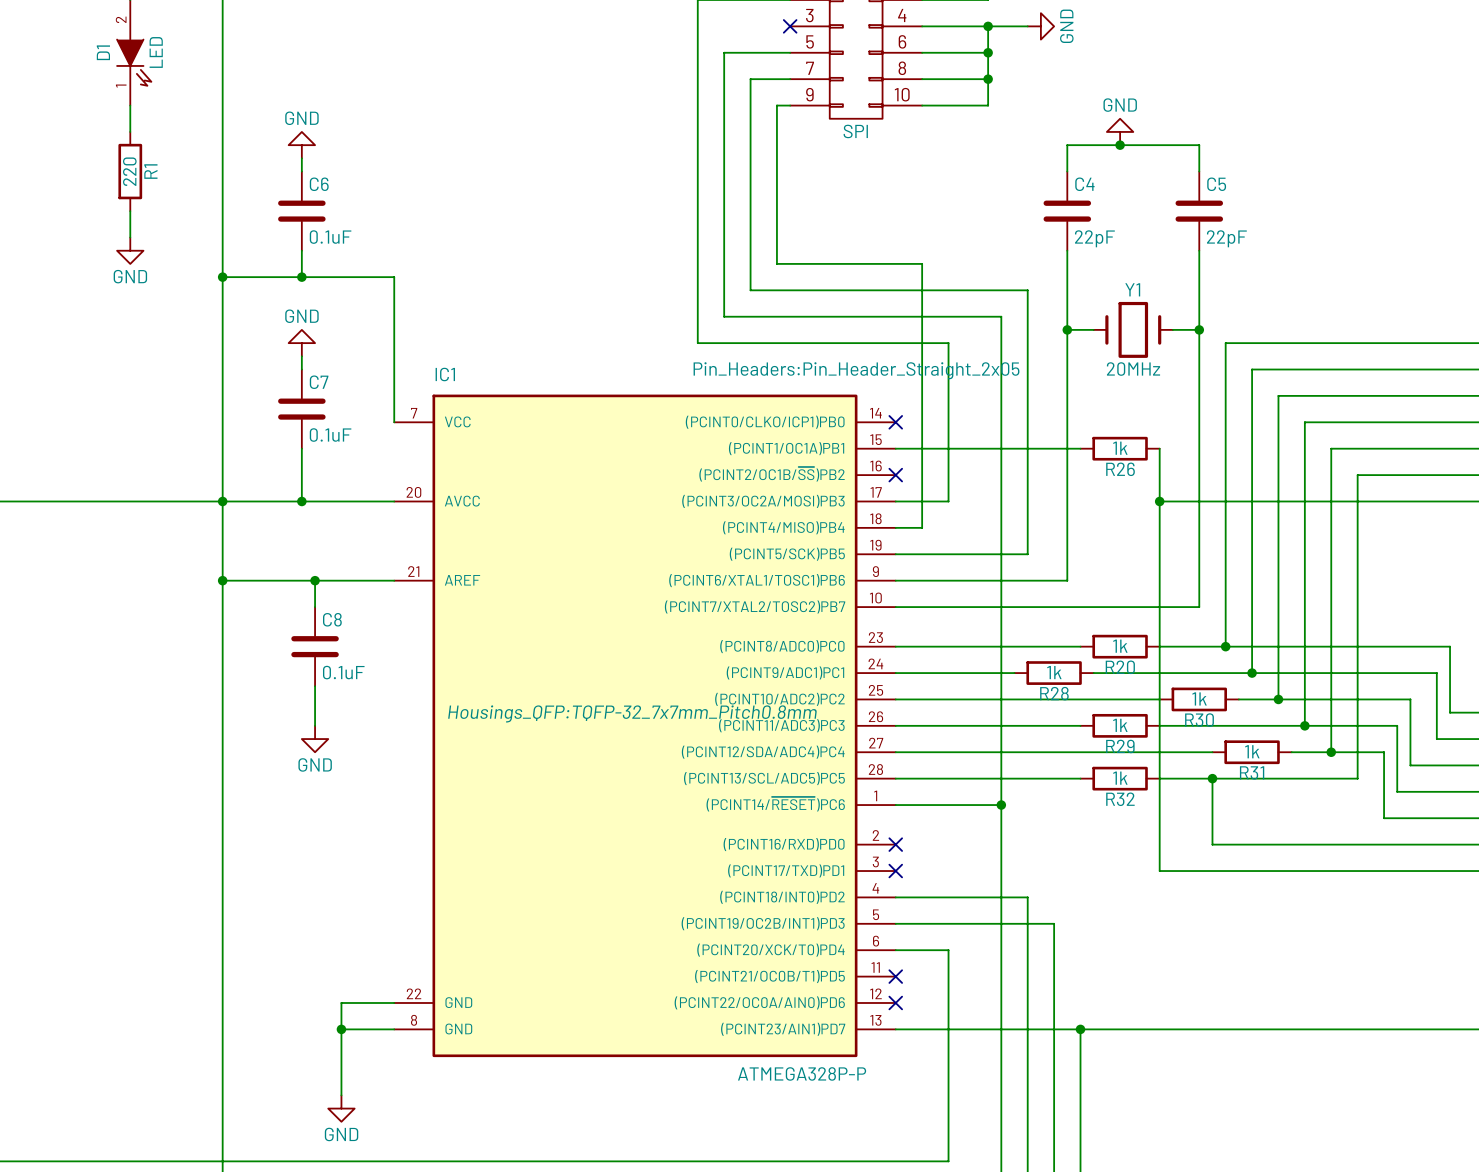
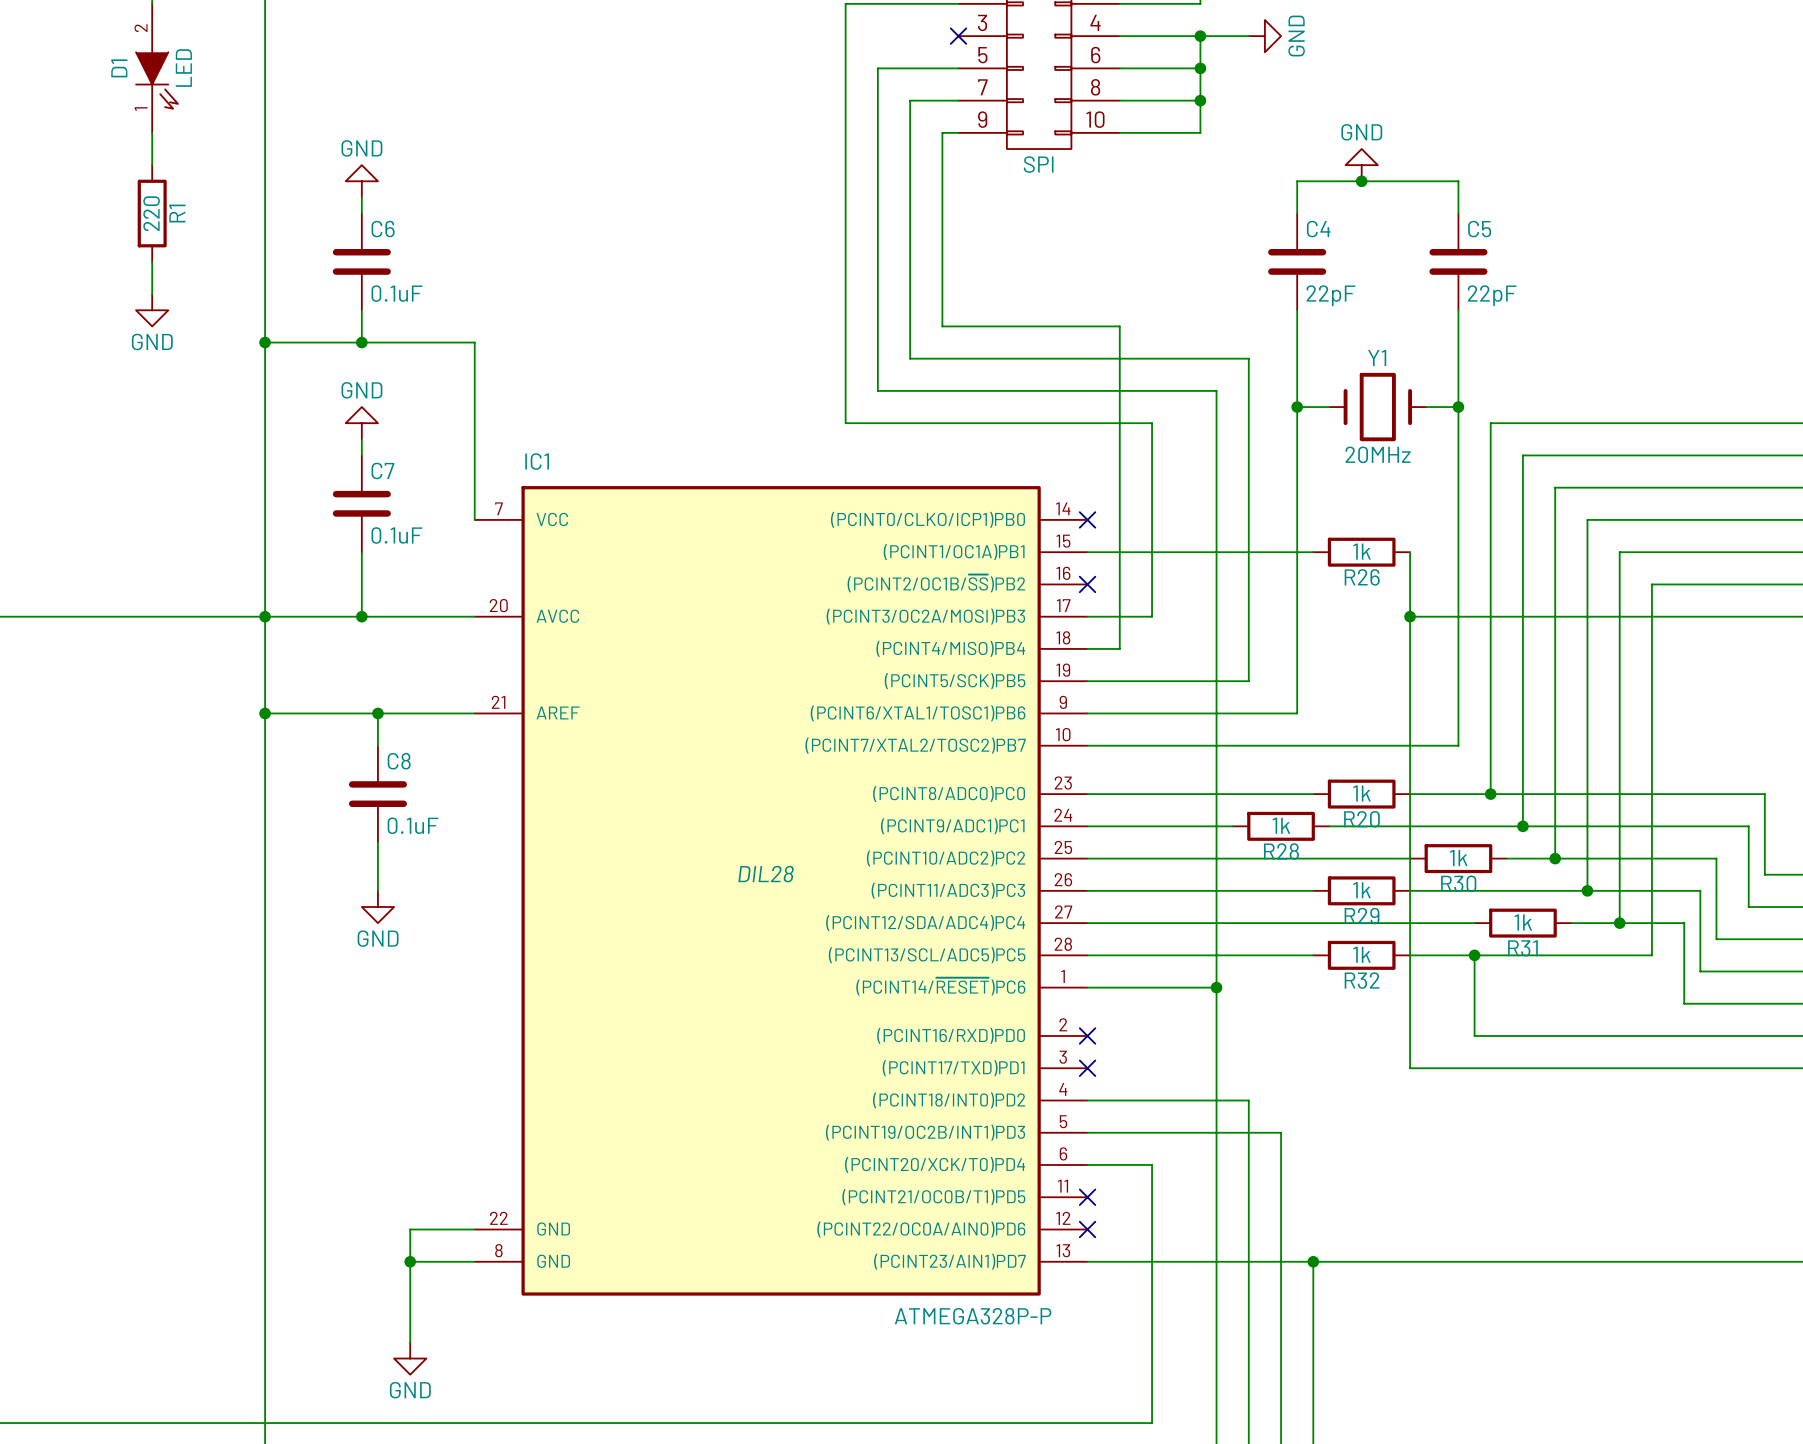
part text: Pin_Headers:Pin_Header_Straight_2x05 (856, 370) -> none
IC1 text: Housings_QFP:TQFP-32_7x7mm_Pitch0.8mm (632, 713) -> DIL28 (766, 874)

